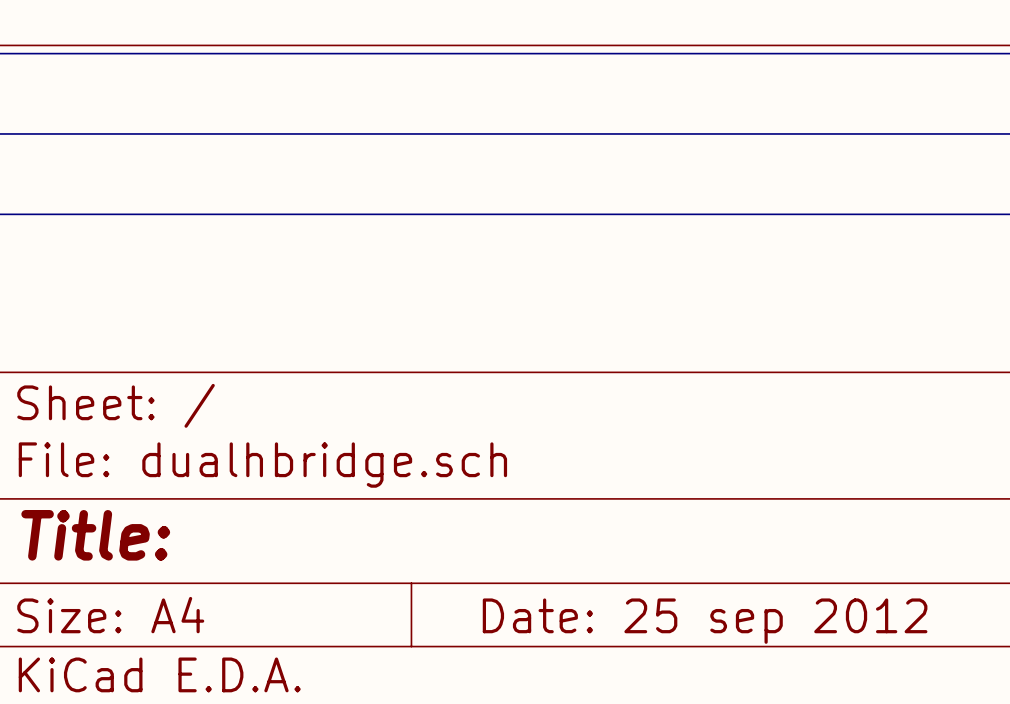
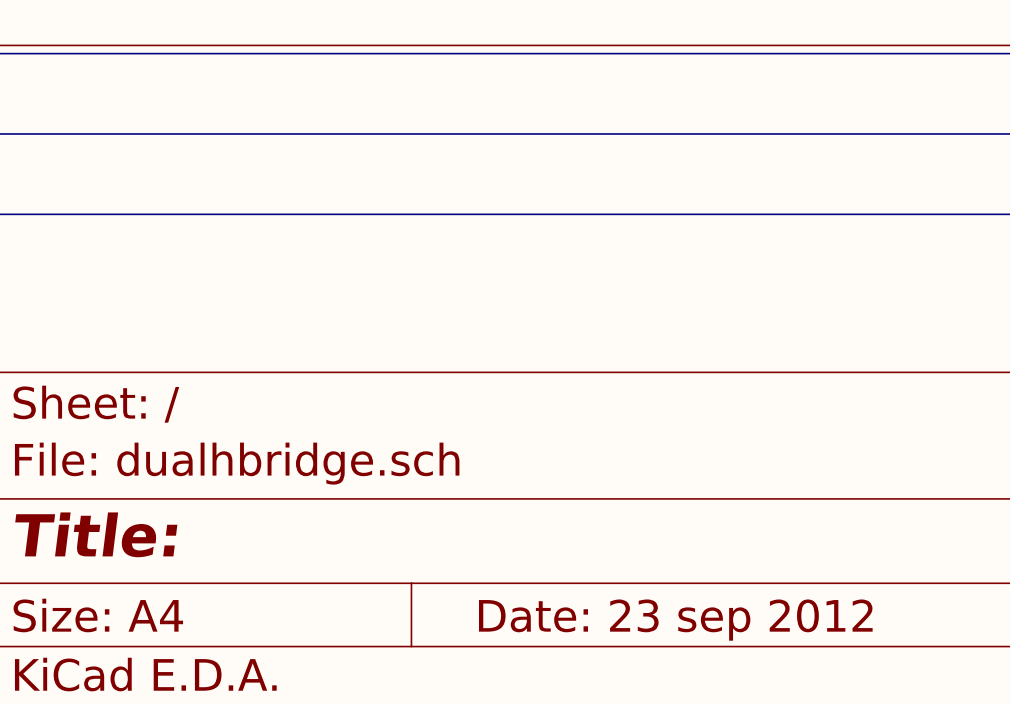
title block: Date: 25 sep 2012 (705, 621) -> Date: 23 sep 2012 (675, 620)

